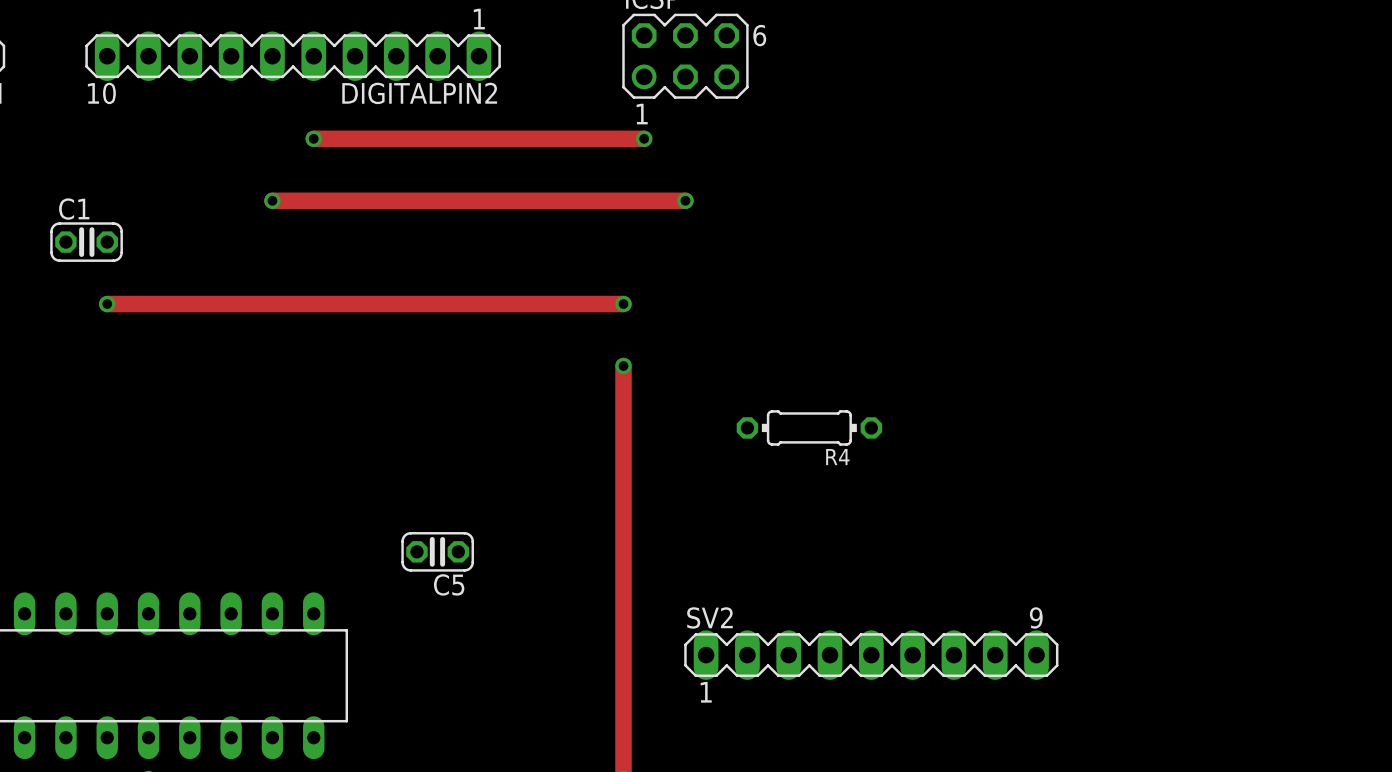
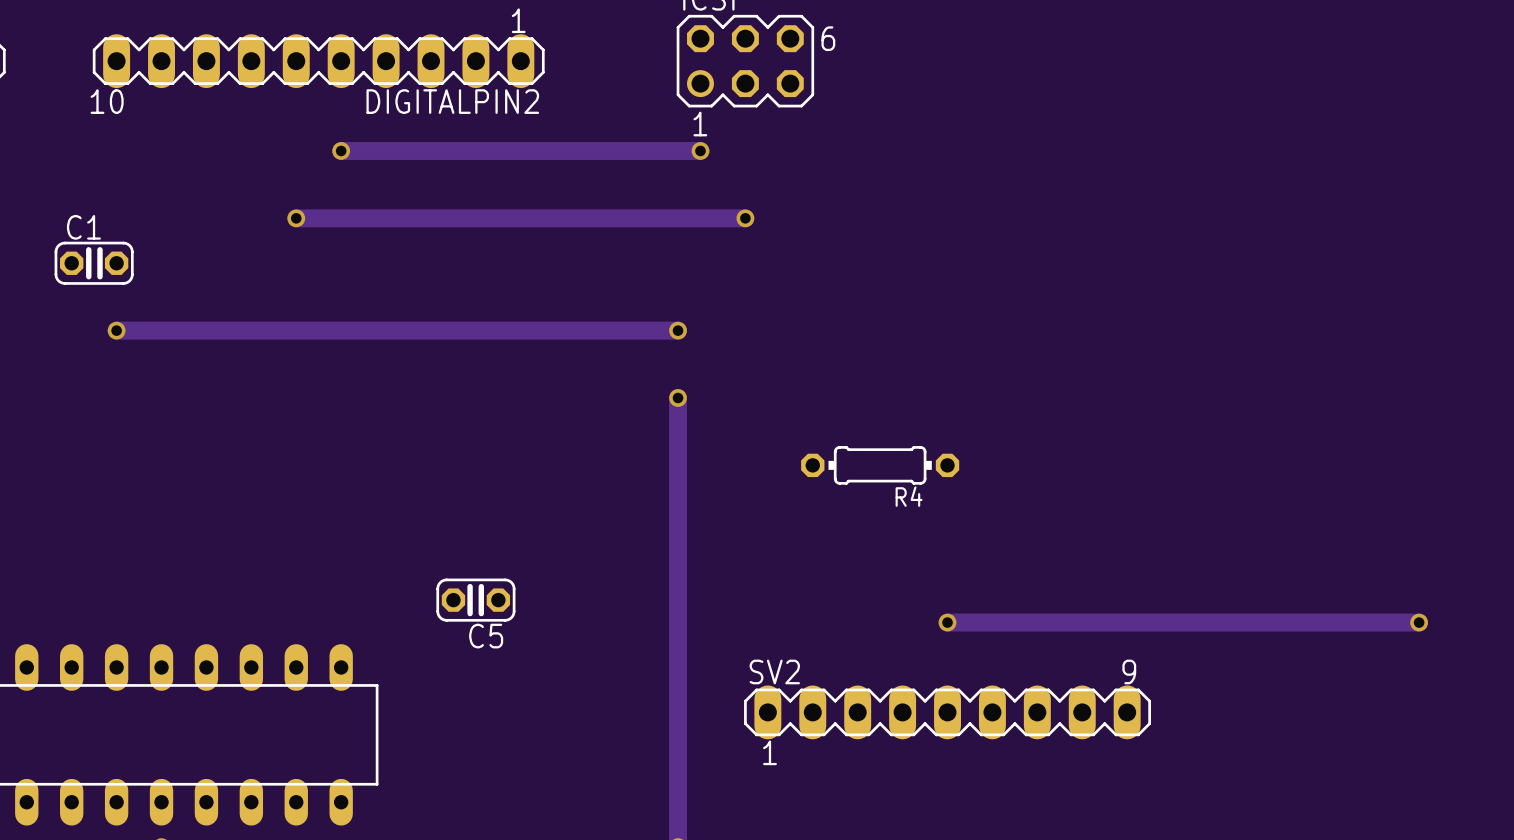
track: none -> (947, 622) (1419, 622)
via: none -> (947, 622)
via: none -> (1419, 622)

